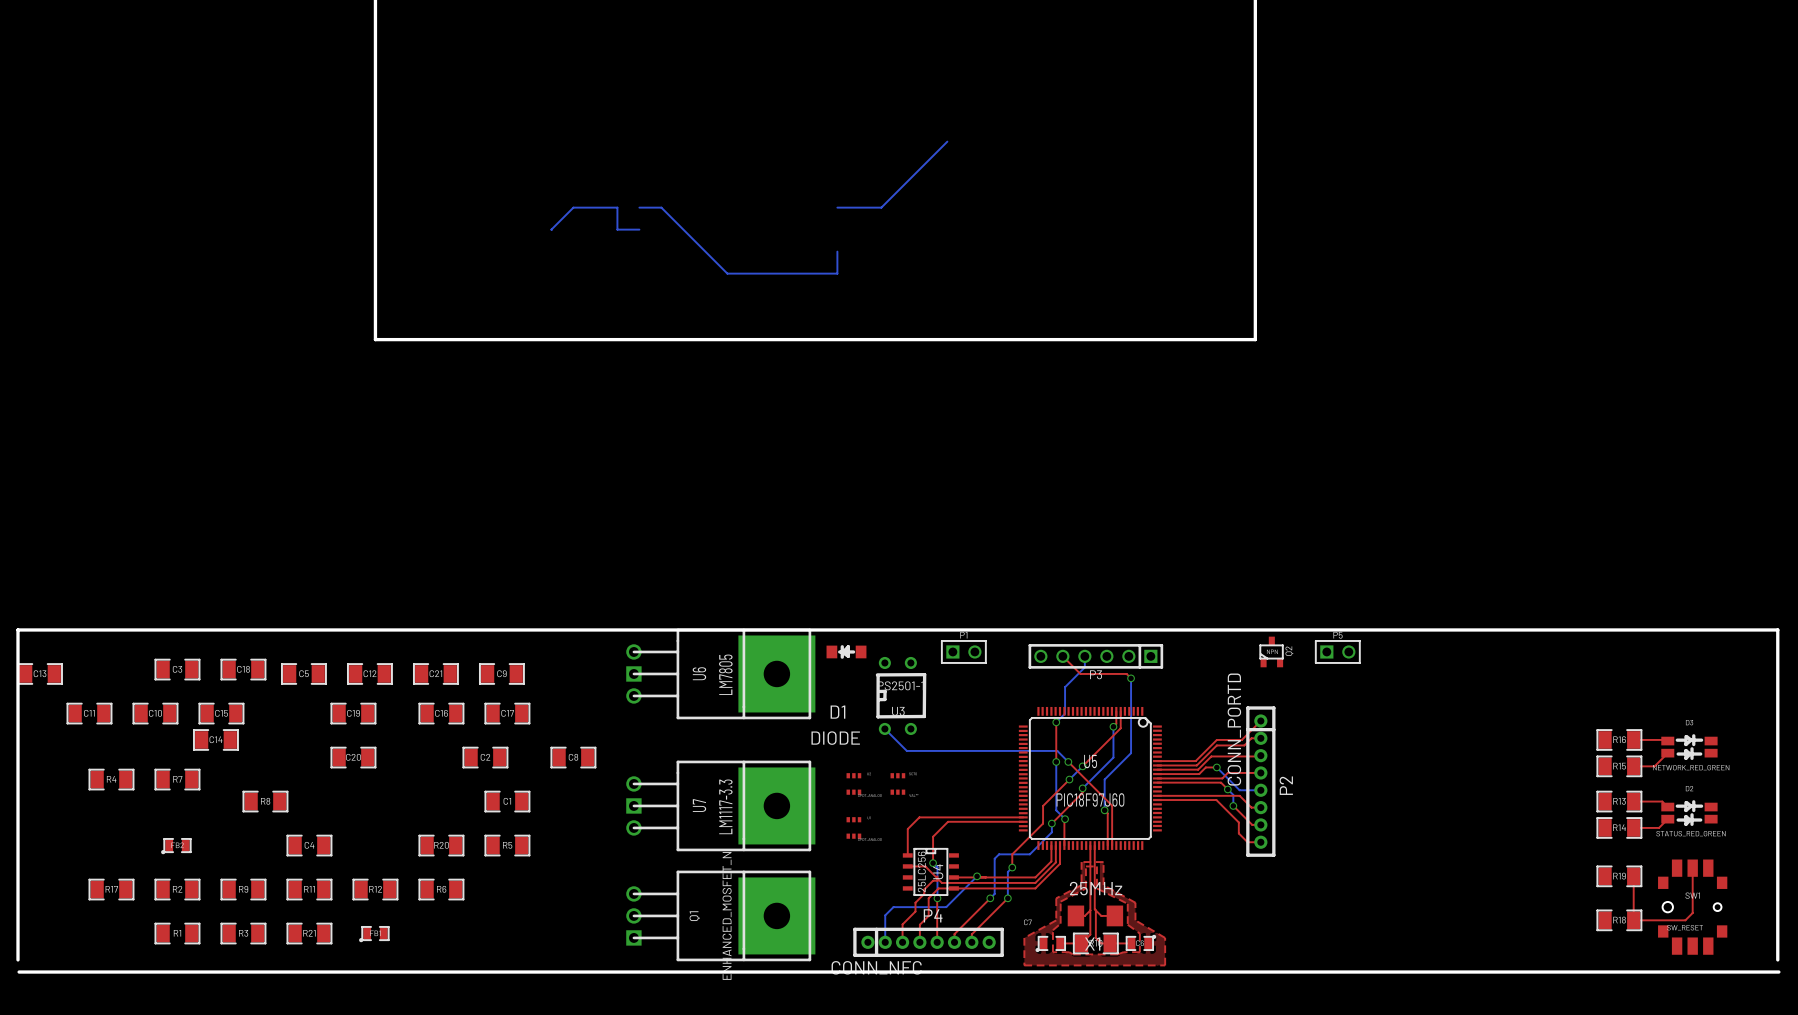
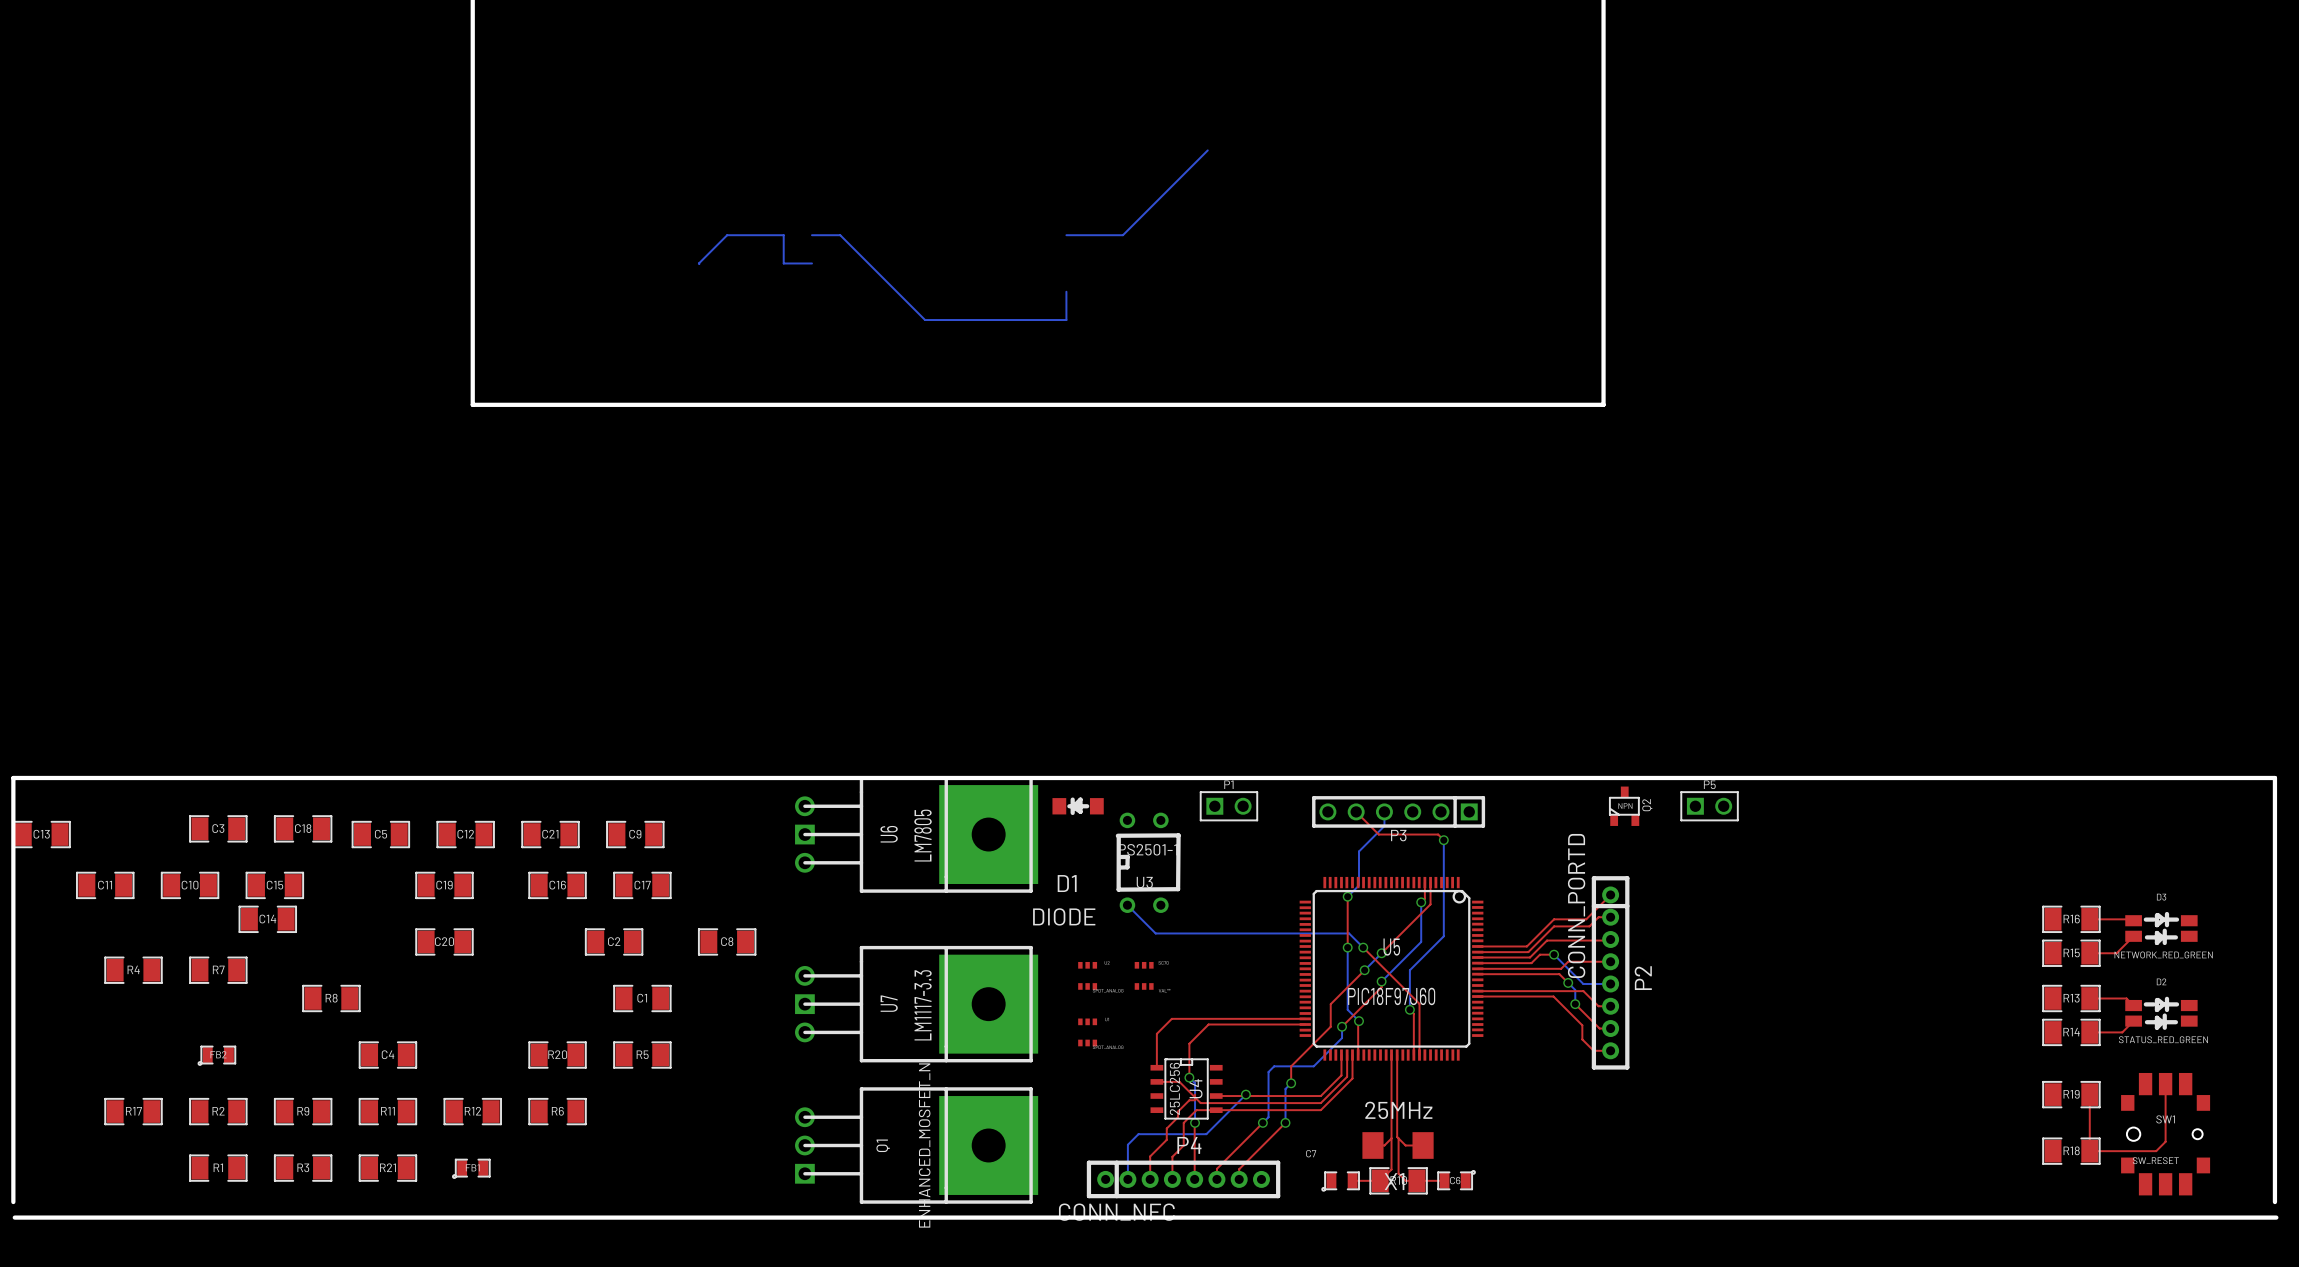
top zone outline: (1081, 862) (1103, 862) (1103, 885) (1135, 902) (1135, 920) (1165, 937) (1165, 965) (1024, 965) (1024, 937) (1056, 920) (1056, 898) (1081, 885) (1081, 862) -> none
top zone outline: (1085, 866) (1085, 888) (1060, 901) (1060, 923) (1052, 930) (1052, 952) (1069, 952) (1072, 954) (1139, 952) (1139, 933) (1127, 924) (1127, 903) (1096, 888) (1096, 866) (1085, 866) -> none

